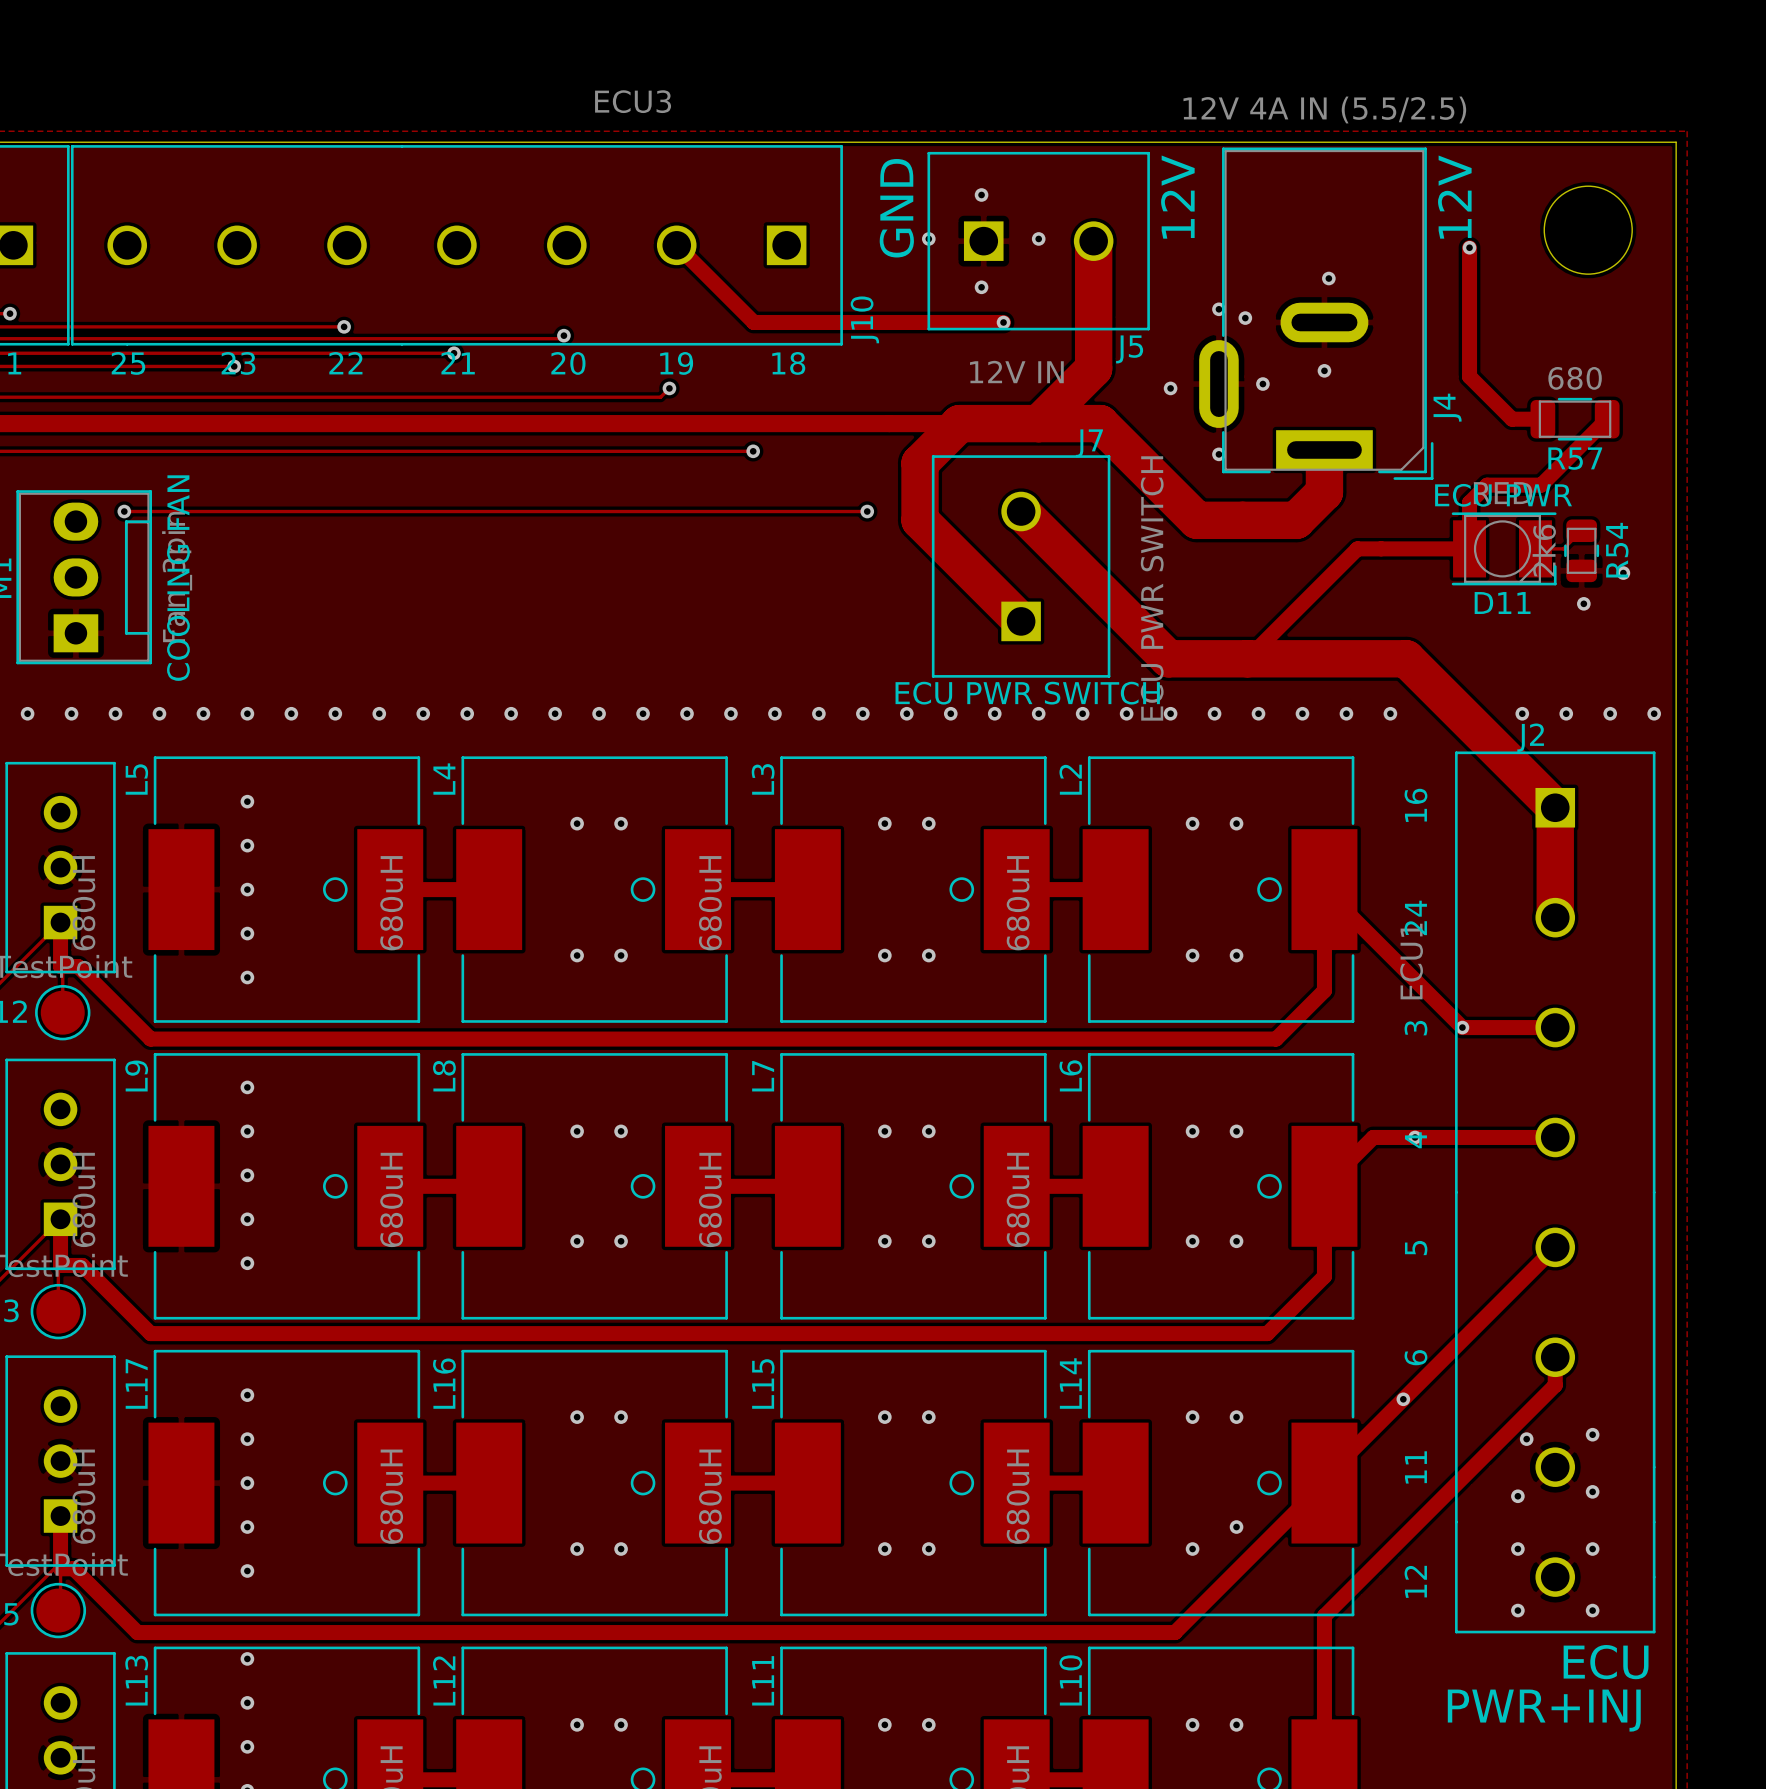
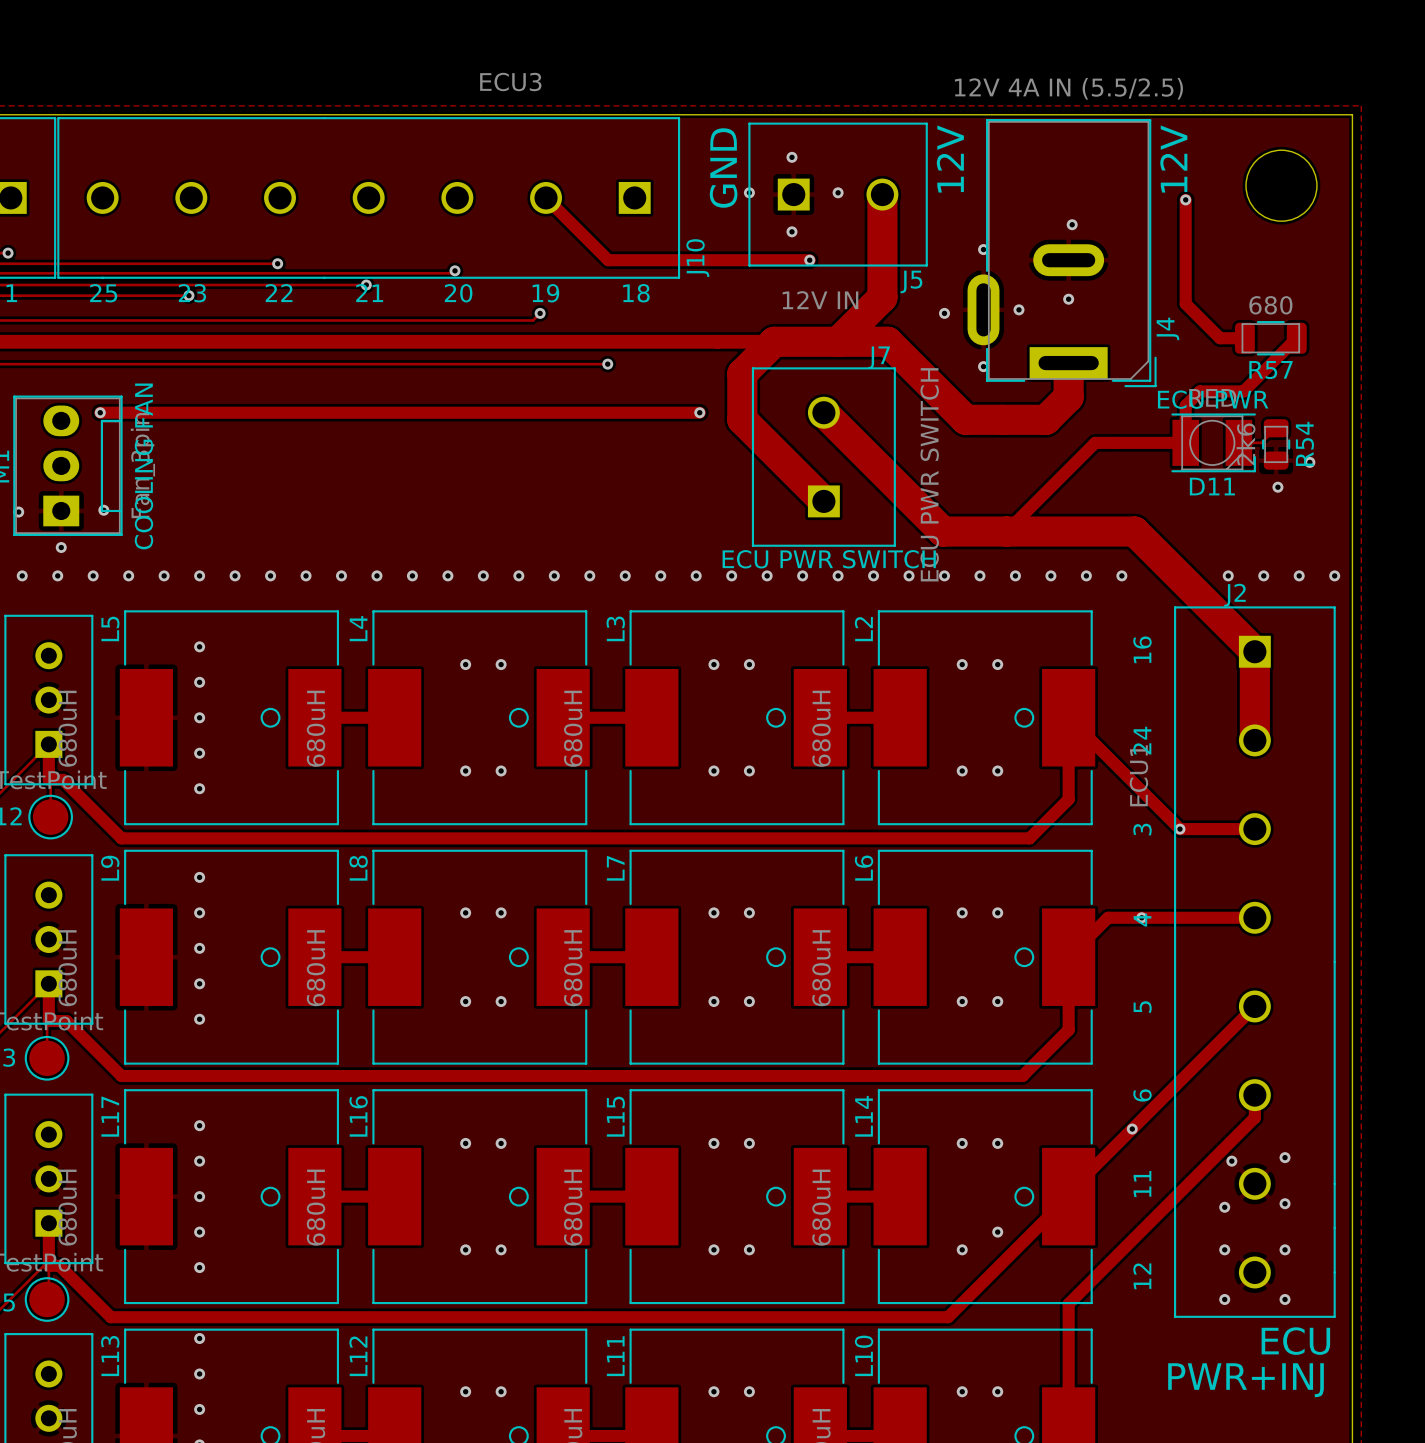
via: (1245, 318) -> none
track width: thin (124, 511) (867, 511) -> thick (100, 412) (699, 412)
via: none -> (103, 510)
via: none -> (18, 512)
via: none -> (61, 547)

